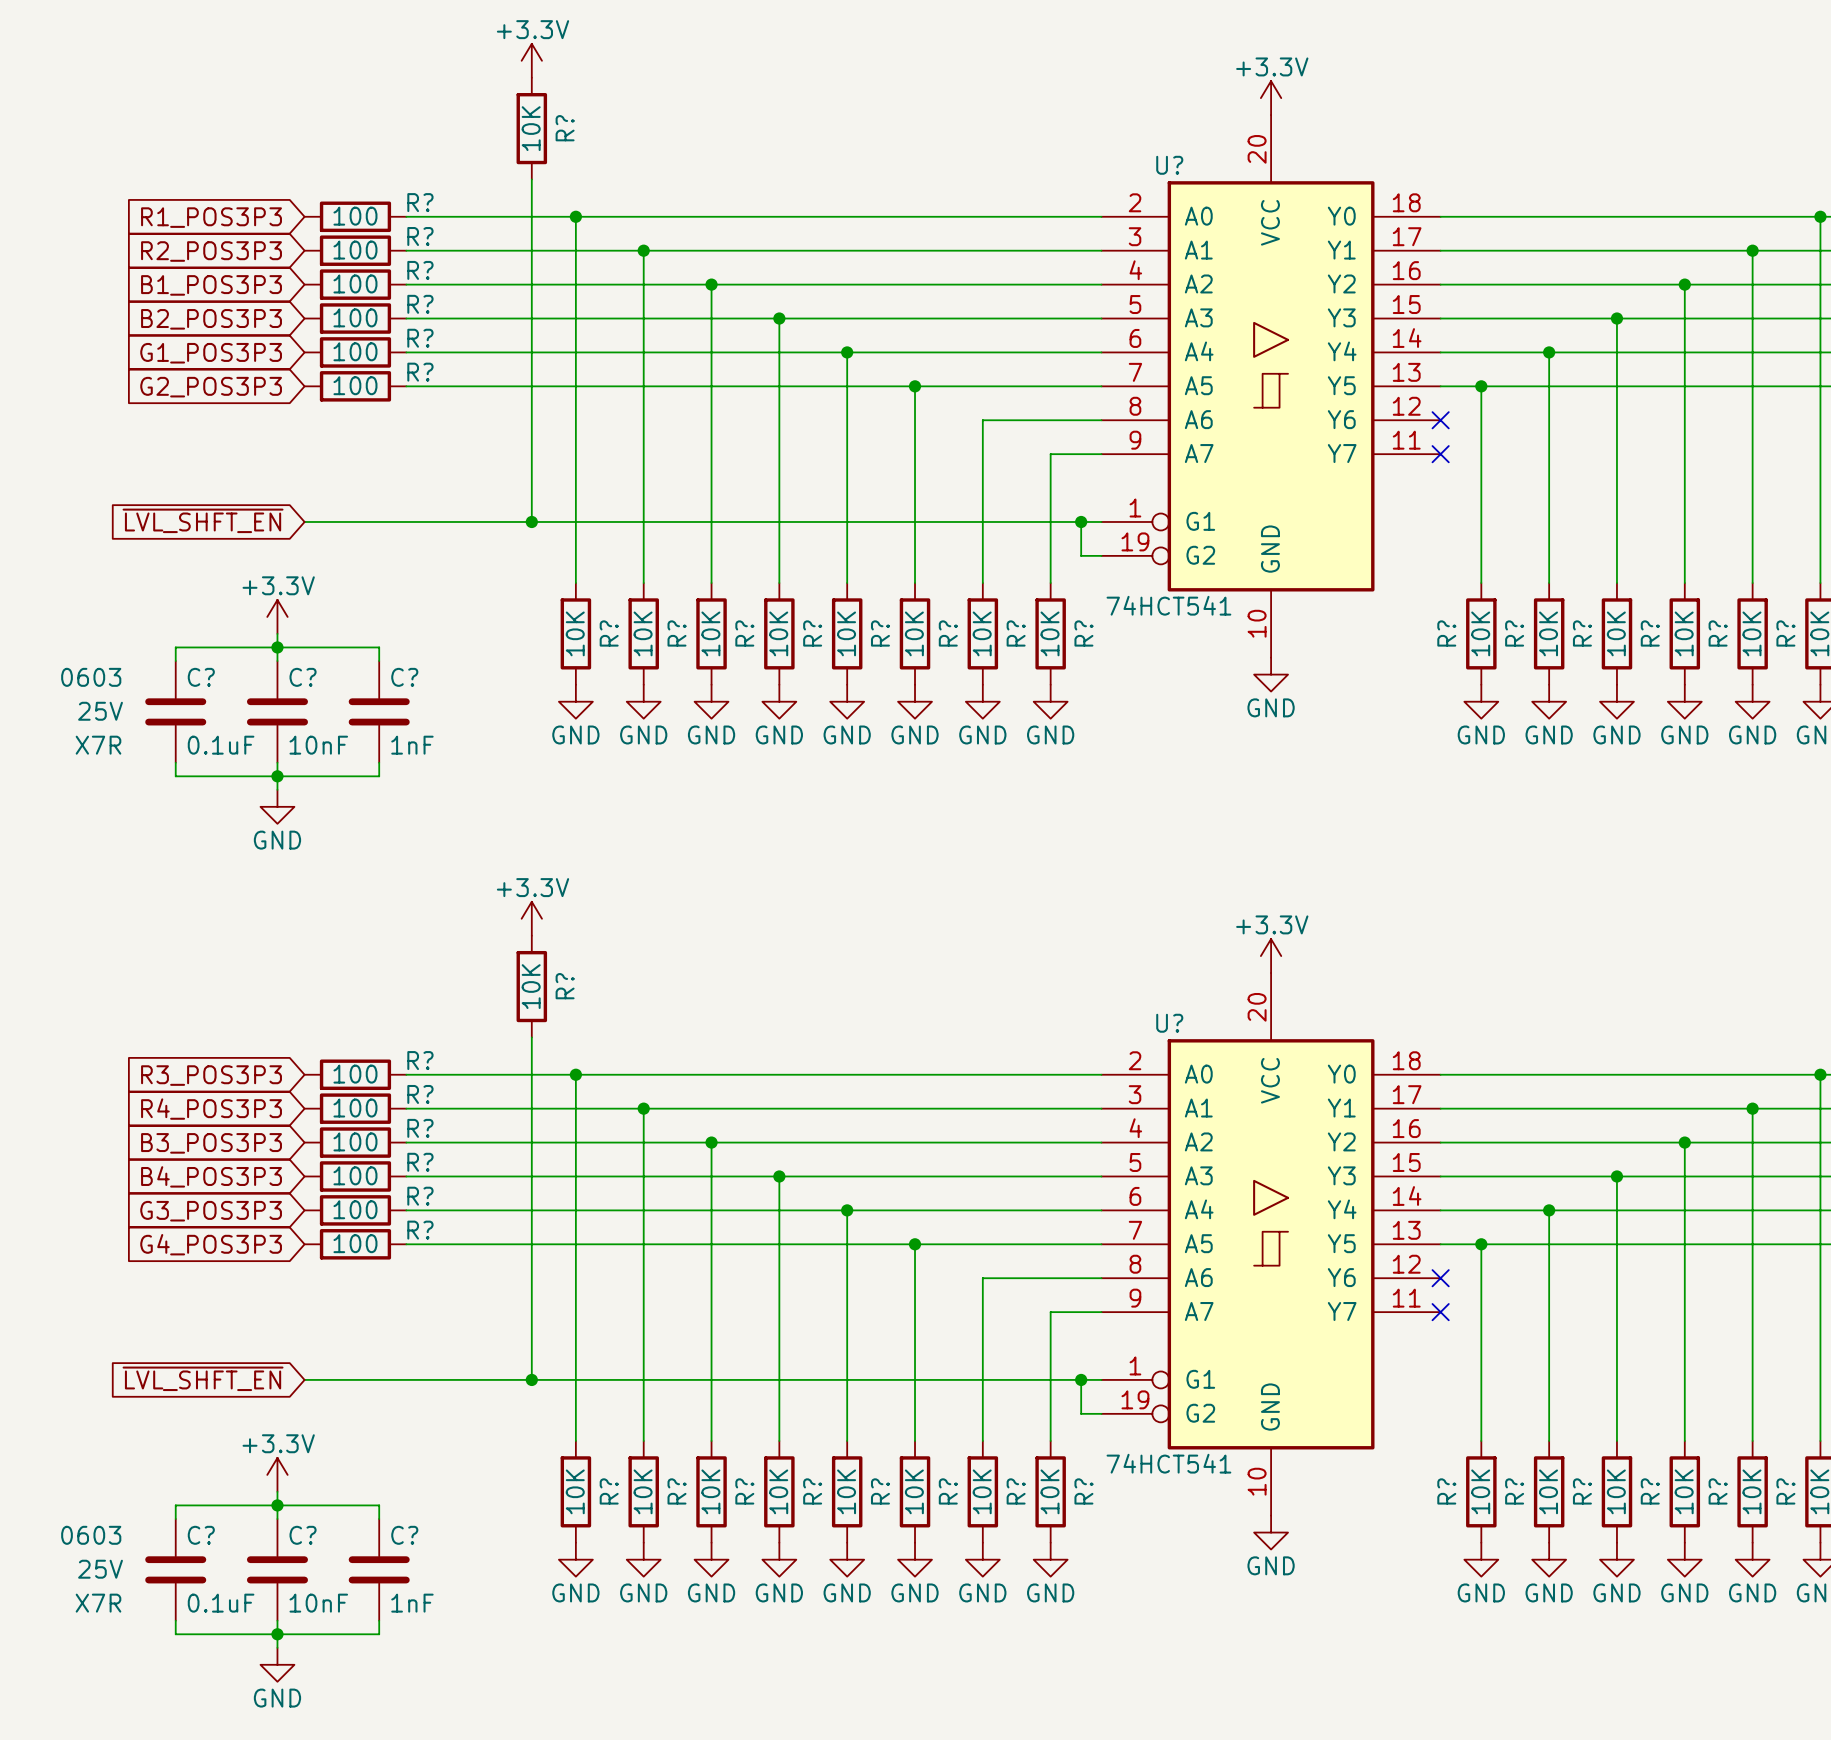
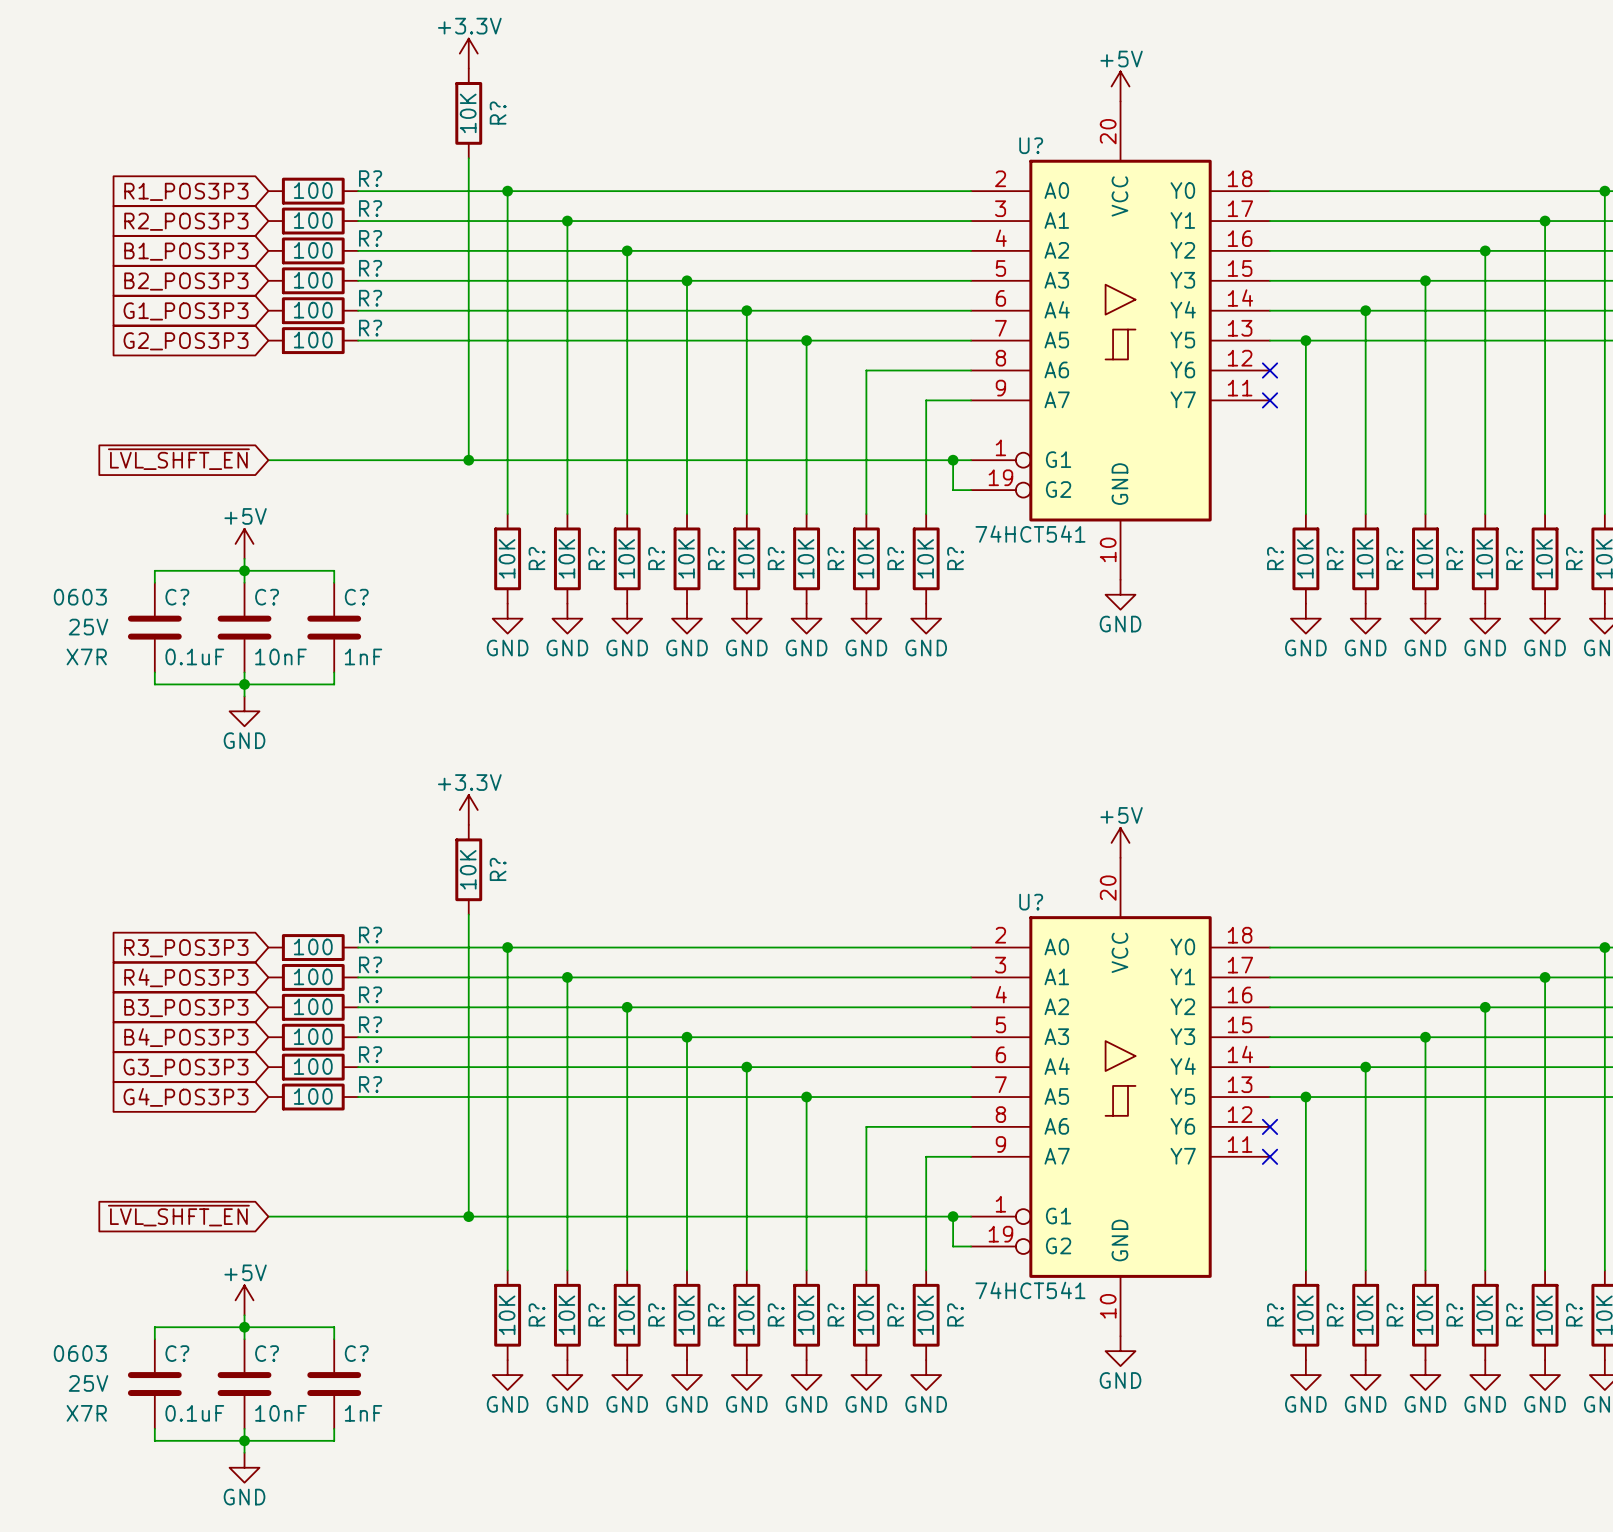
power symbol: +3.3V (1271, 98) -> +5V (1120, 86)
power symbol: +3.3V (277, 616) -> +5V (244, 543)
power symbol: +3.3V (1271, 956) -> +5V (1120, 842)
power symbol: +3.3V (277, 1474) -> +5V (244, 1300)

